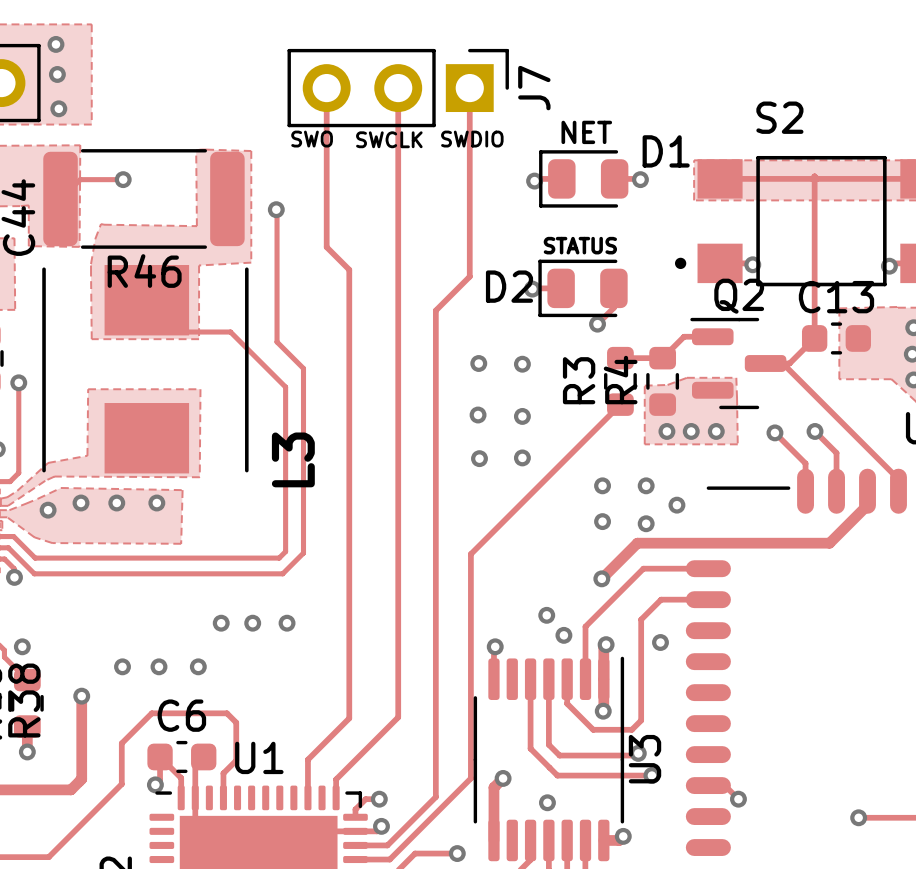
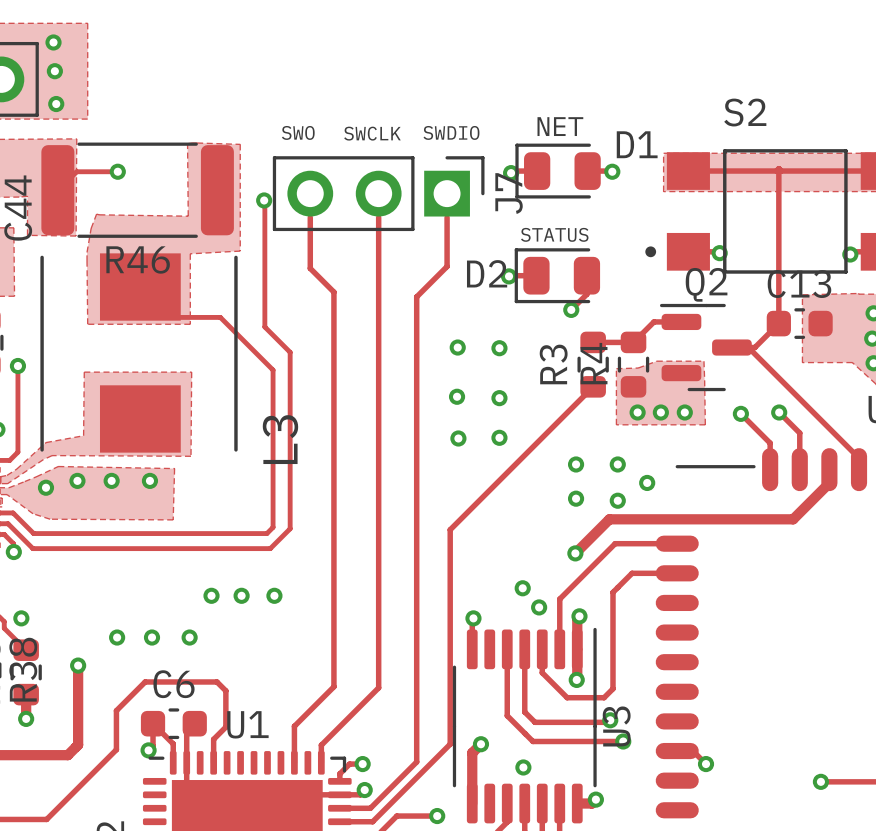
track: (326, 88) (326, 247) (349, 269) (349, 305) -> (310, 217) (310, 268) (333, 292)
track: (398, 88) (398, 717) (396, 719) -> (378, 217) (378, 687)
J7 position: (398, 88) -> (378, 193)
track: (469, 88) (469, 276) (467, 278) -> (447, 217) (447, 266)
via: (660, 642) -> none

